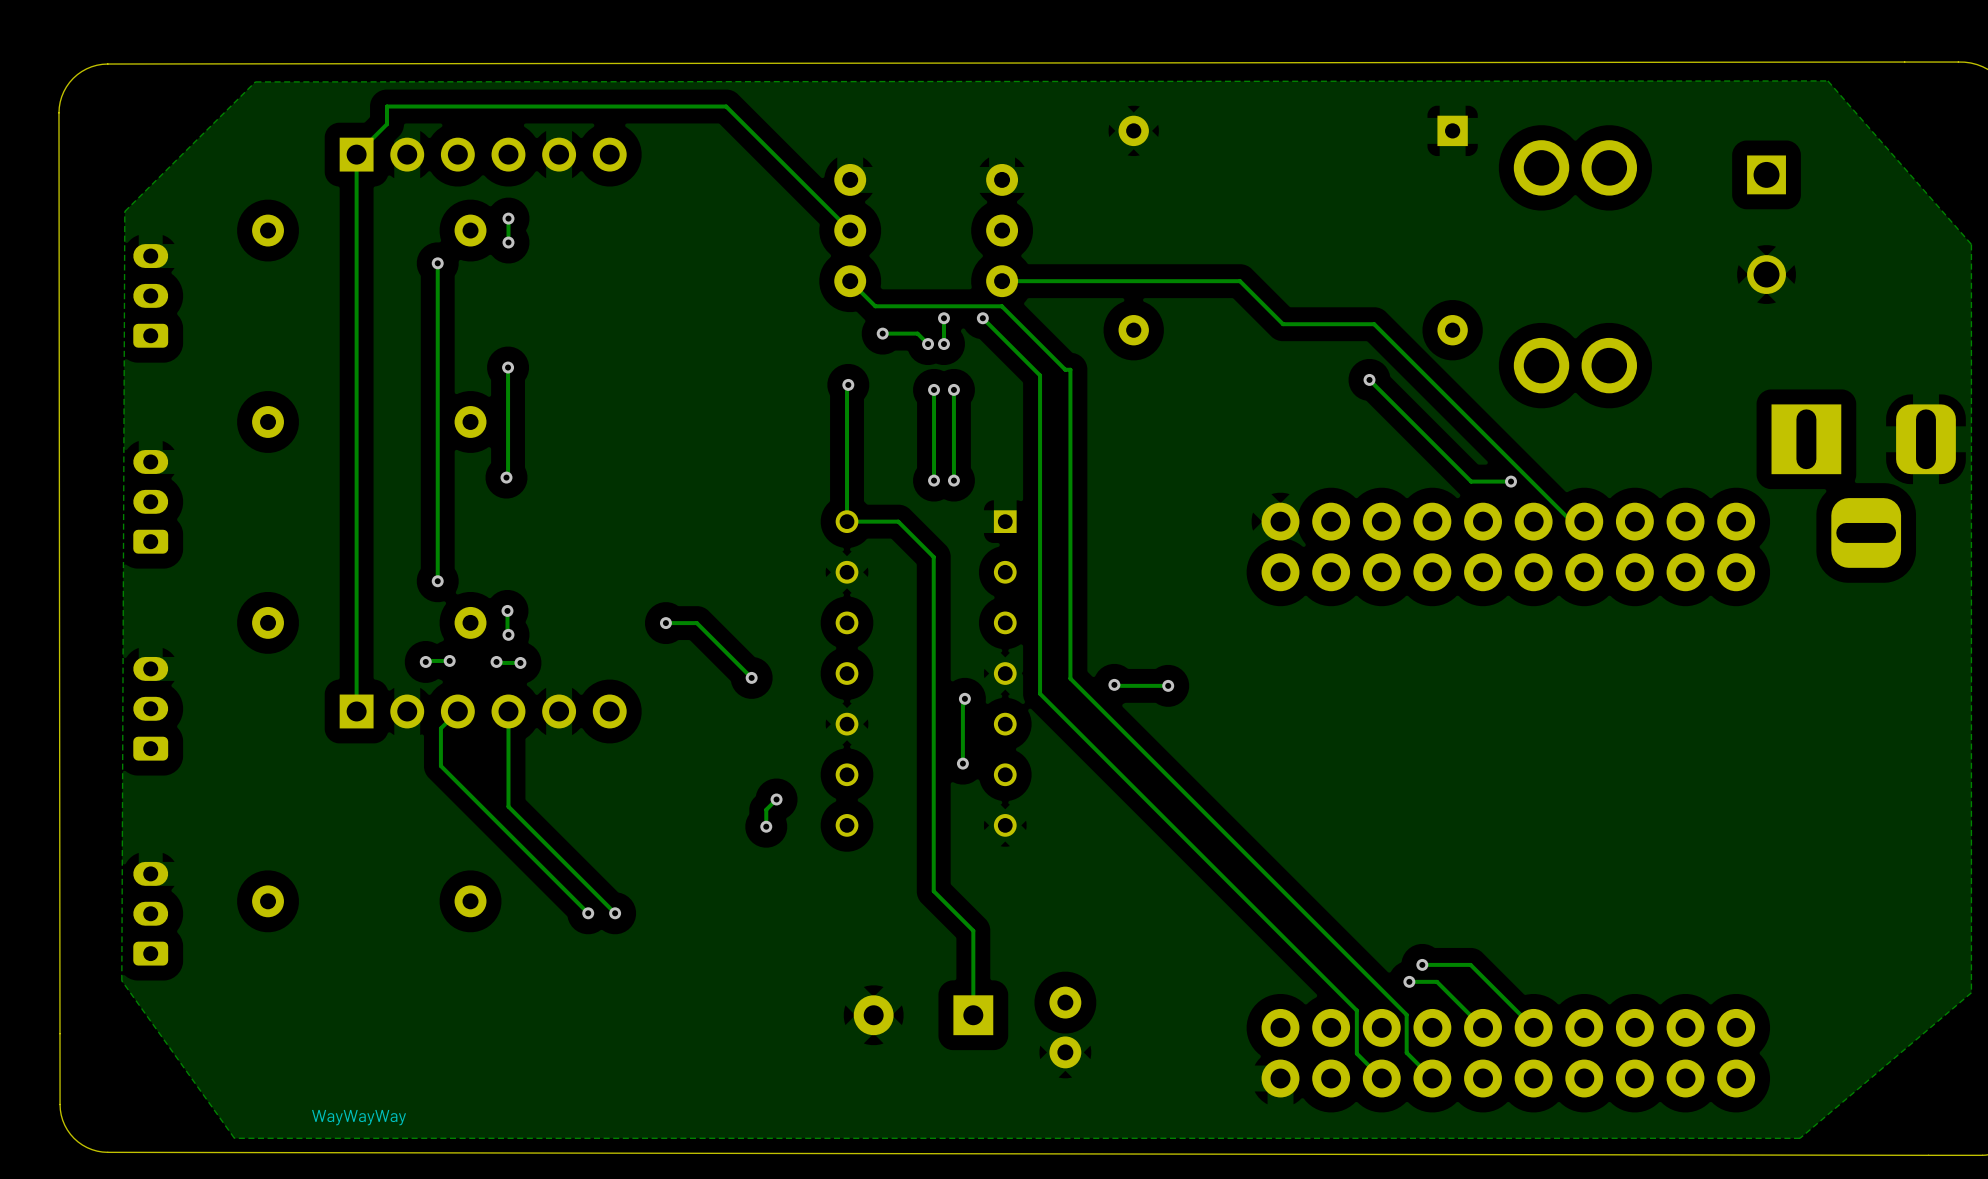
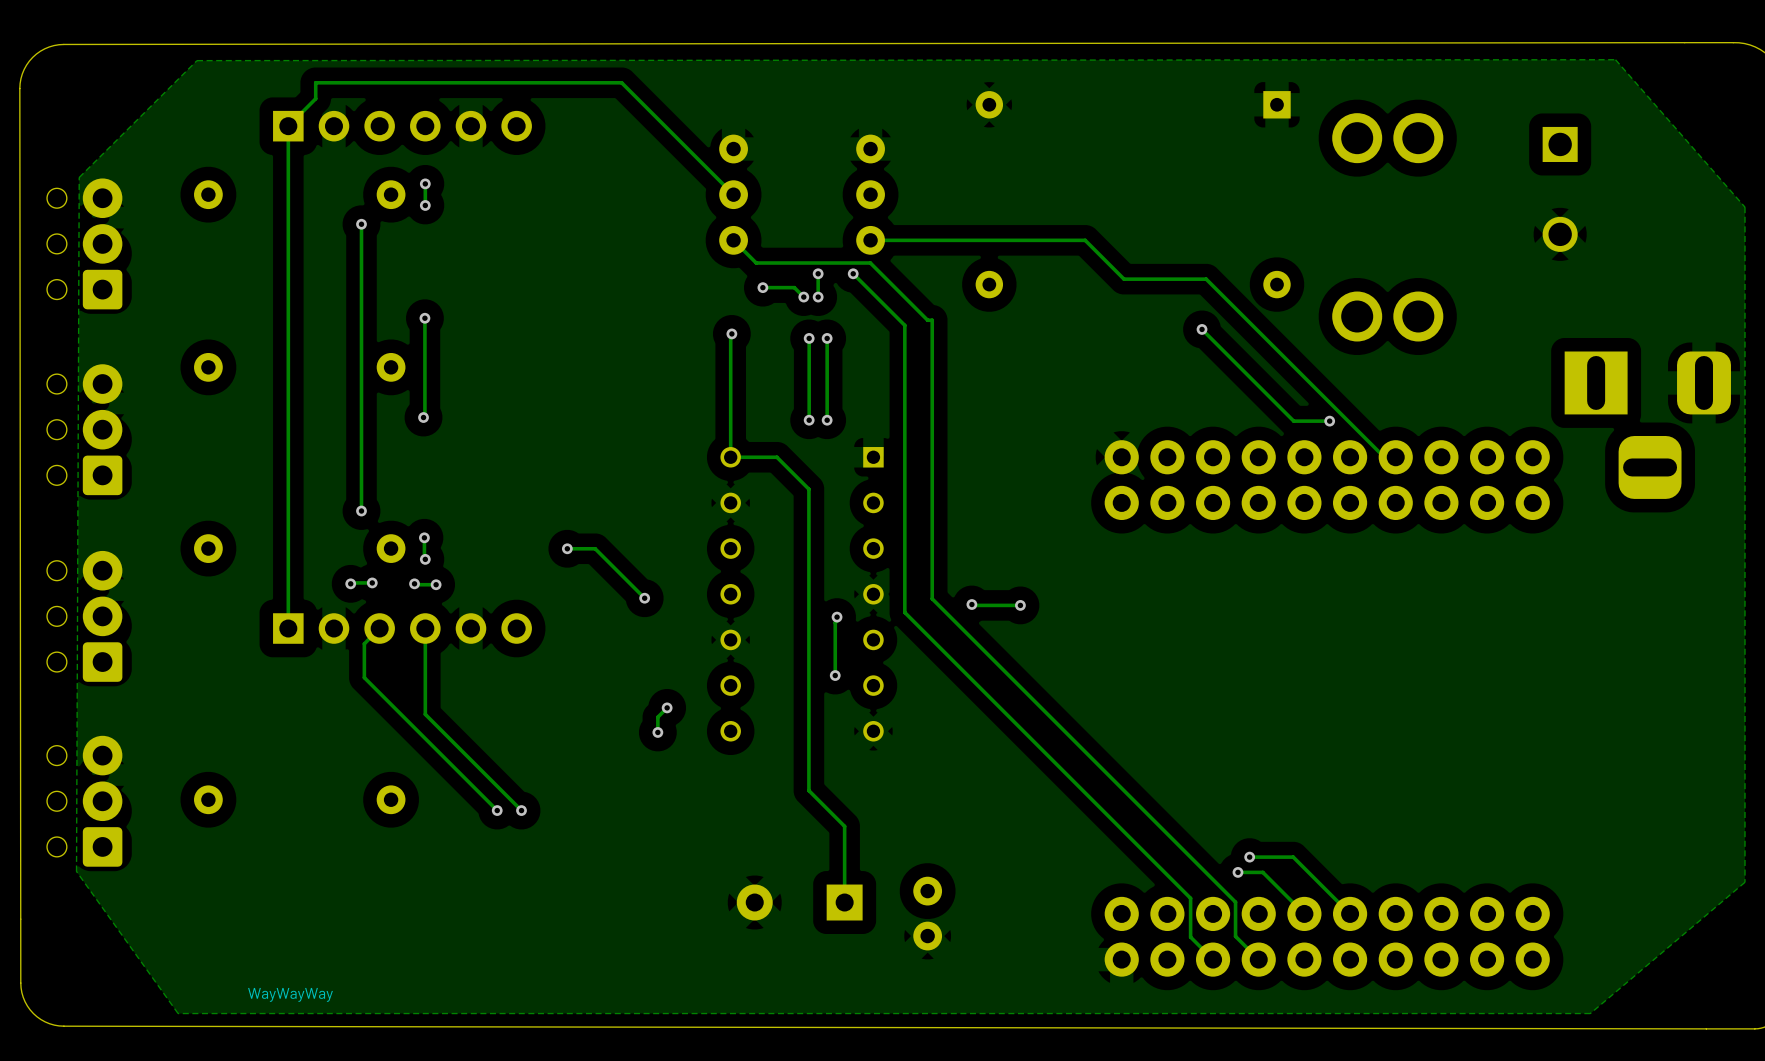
part: none -> (84, 243)
part: (150, 295) -> none
part: none -> (84, 429)
part: (150, 501) -> none
part: none -> (84, 616)
part: (150, 708) -> none
part: none -> (84, 801)
part: (150, 913) -> none

